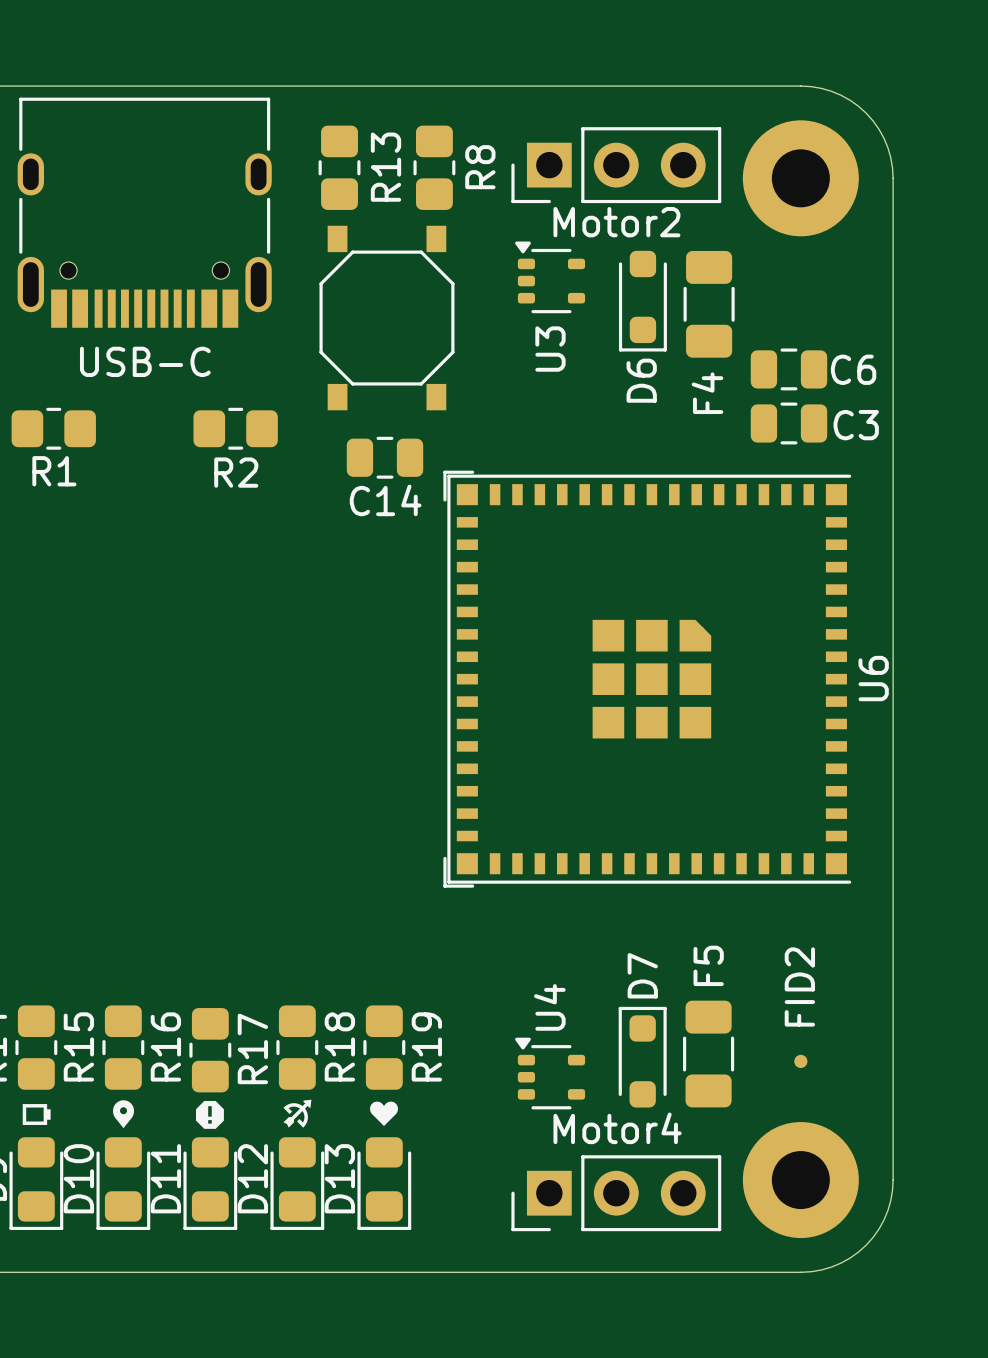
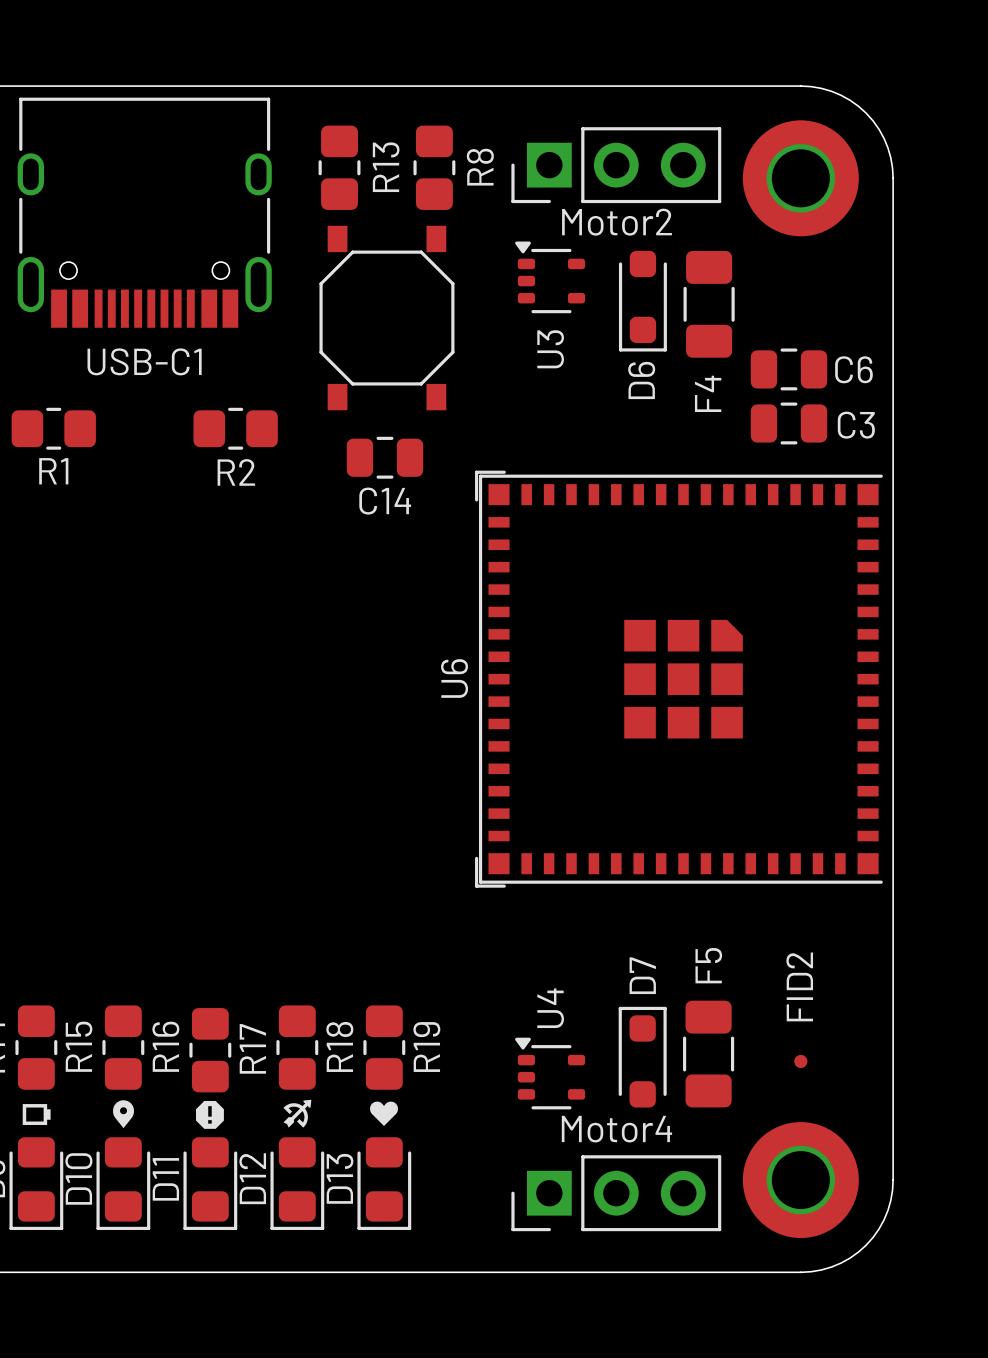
USB-C name: USB-C (145, 361) -> USB-C1 (144, 361)
U6 name position: U6 (873, 678) -> U6 (454, 678)
U6 position: (647, 679) -> (678, 679)

